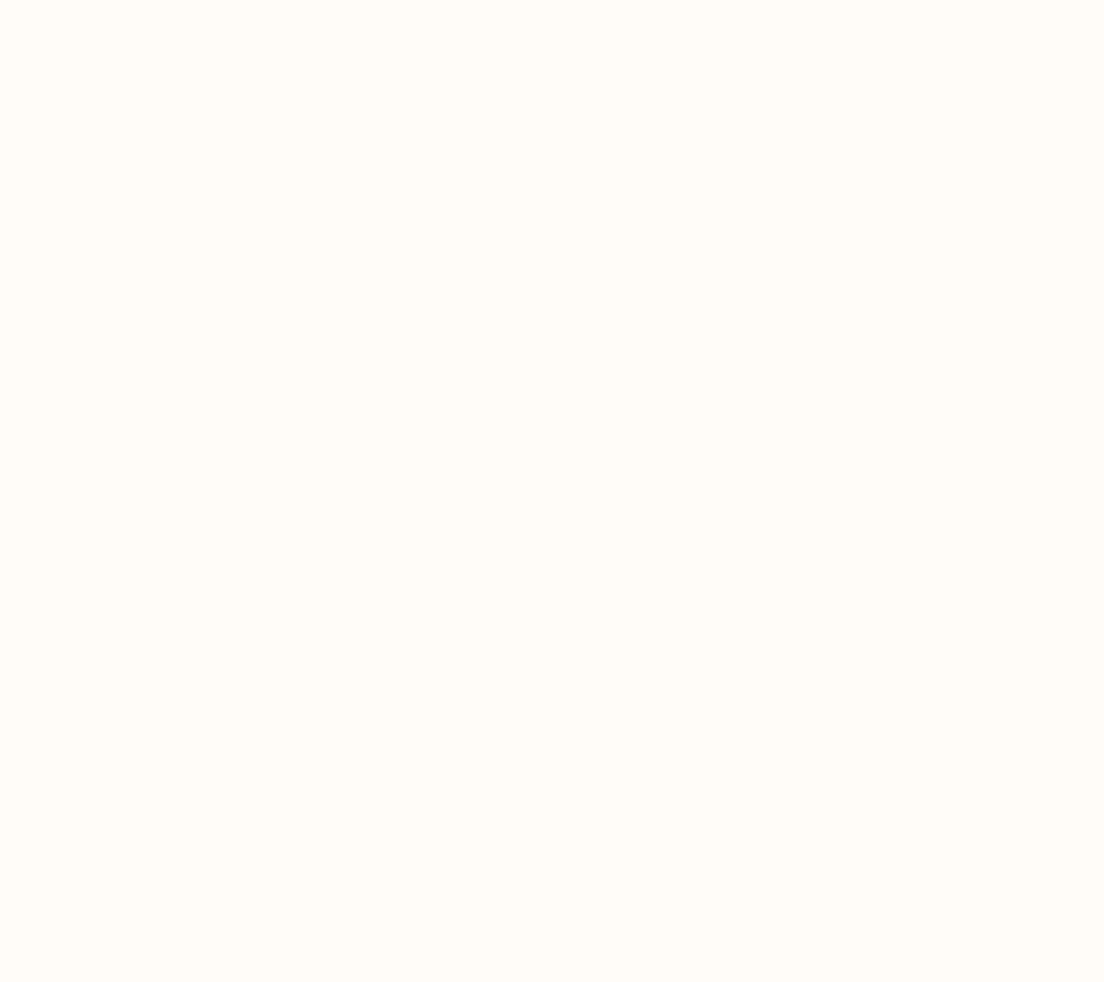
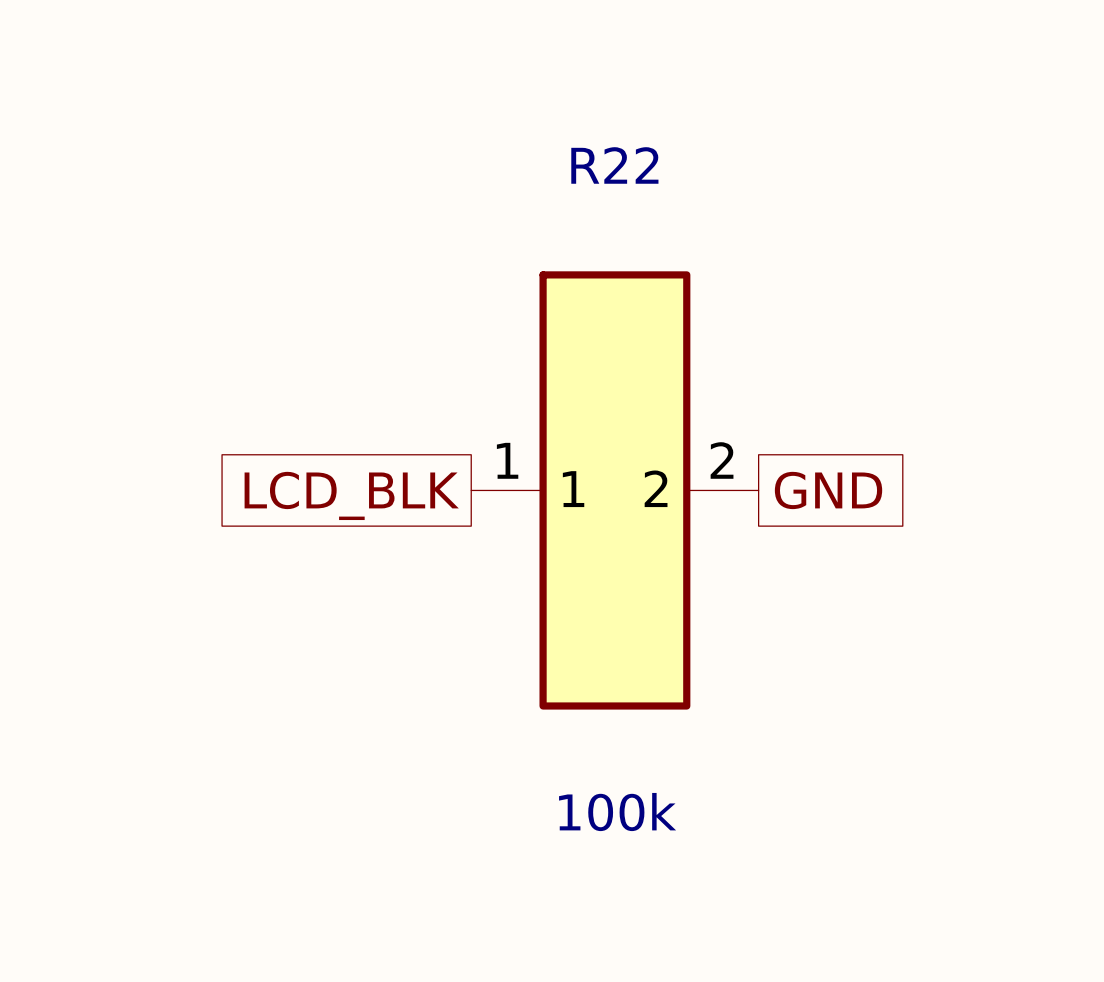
R22: none -> 100k (614, 490)
global label: none -> GND (828, 490)
global label: none -> LCD_BLK (351, 495)

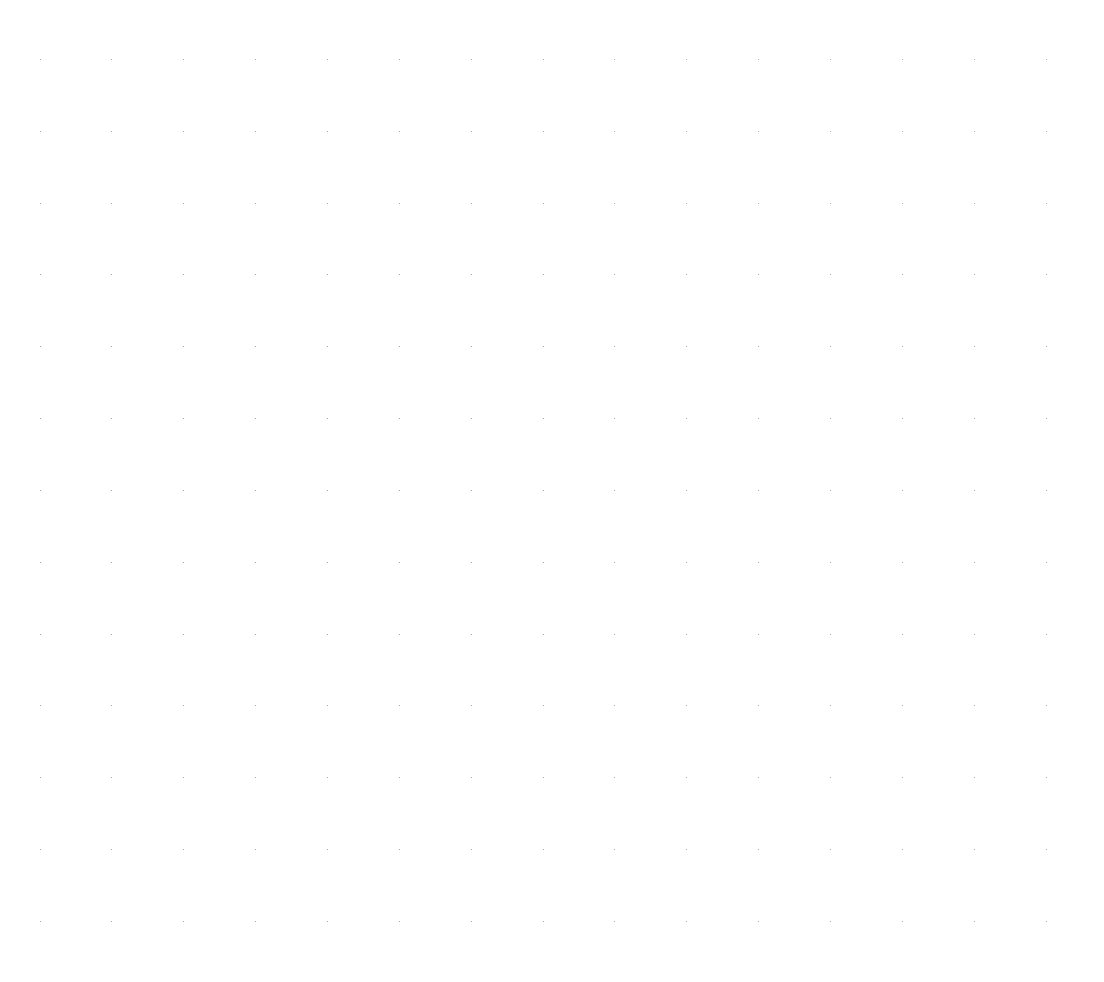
R22: 100k (614, 490) -> none
global label: GND (828, 490) -> none
global label: LCD_BLK (351, 495) -> none

